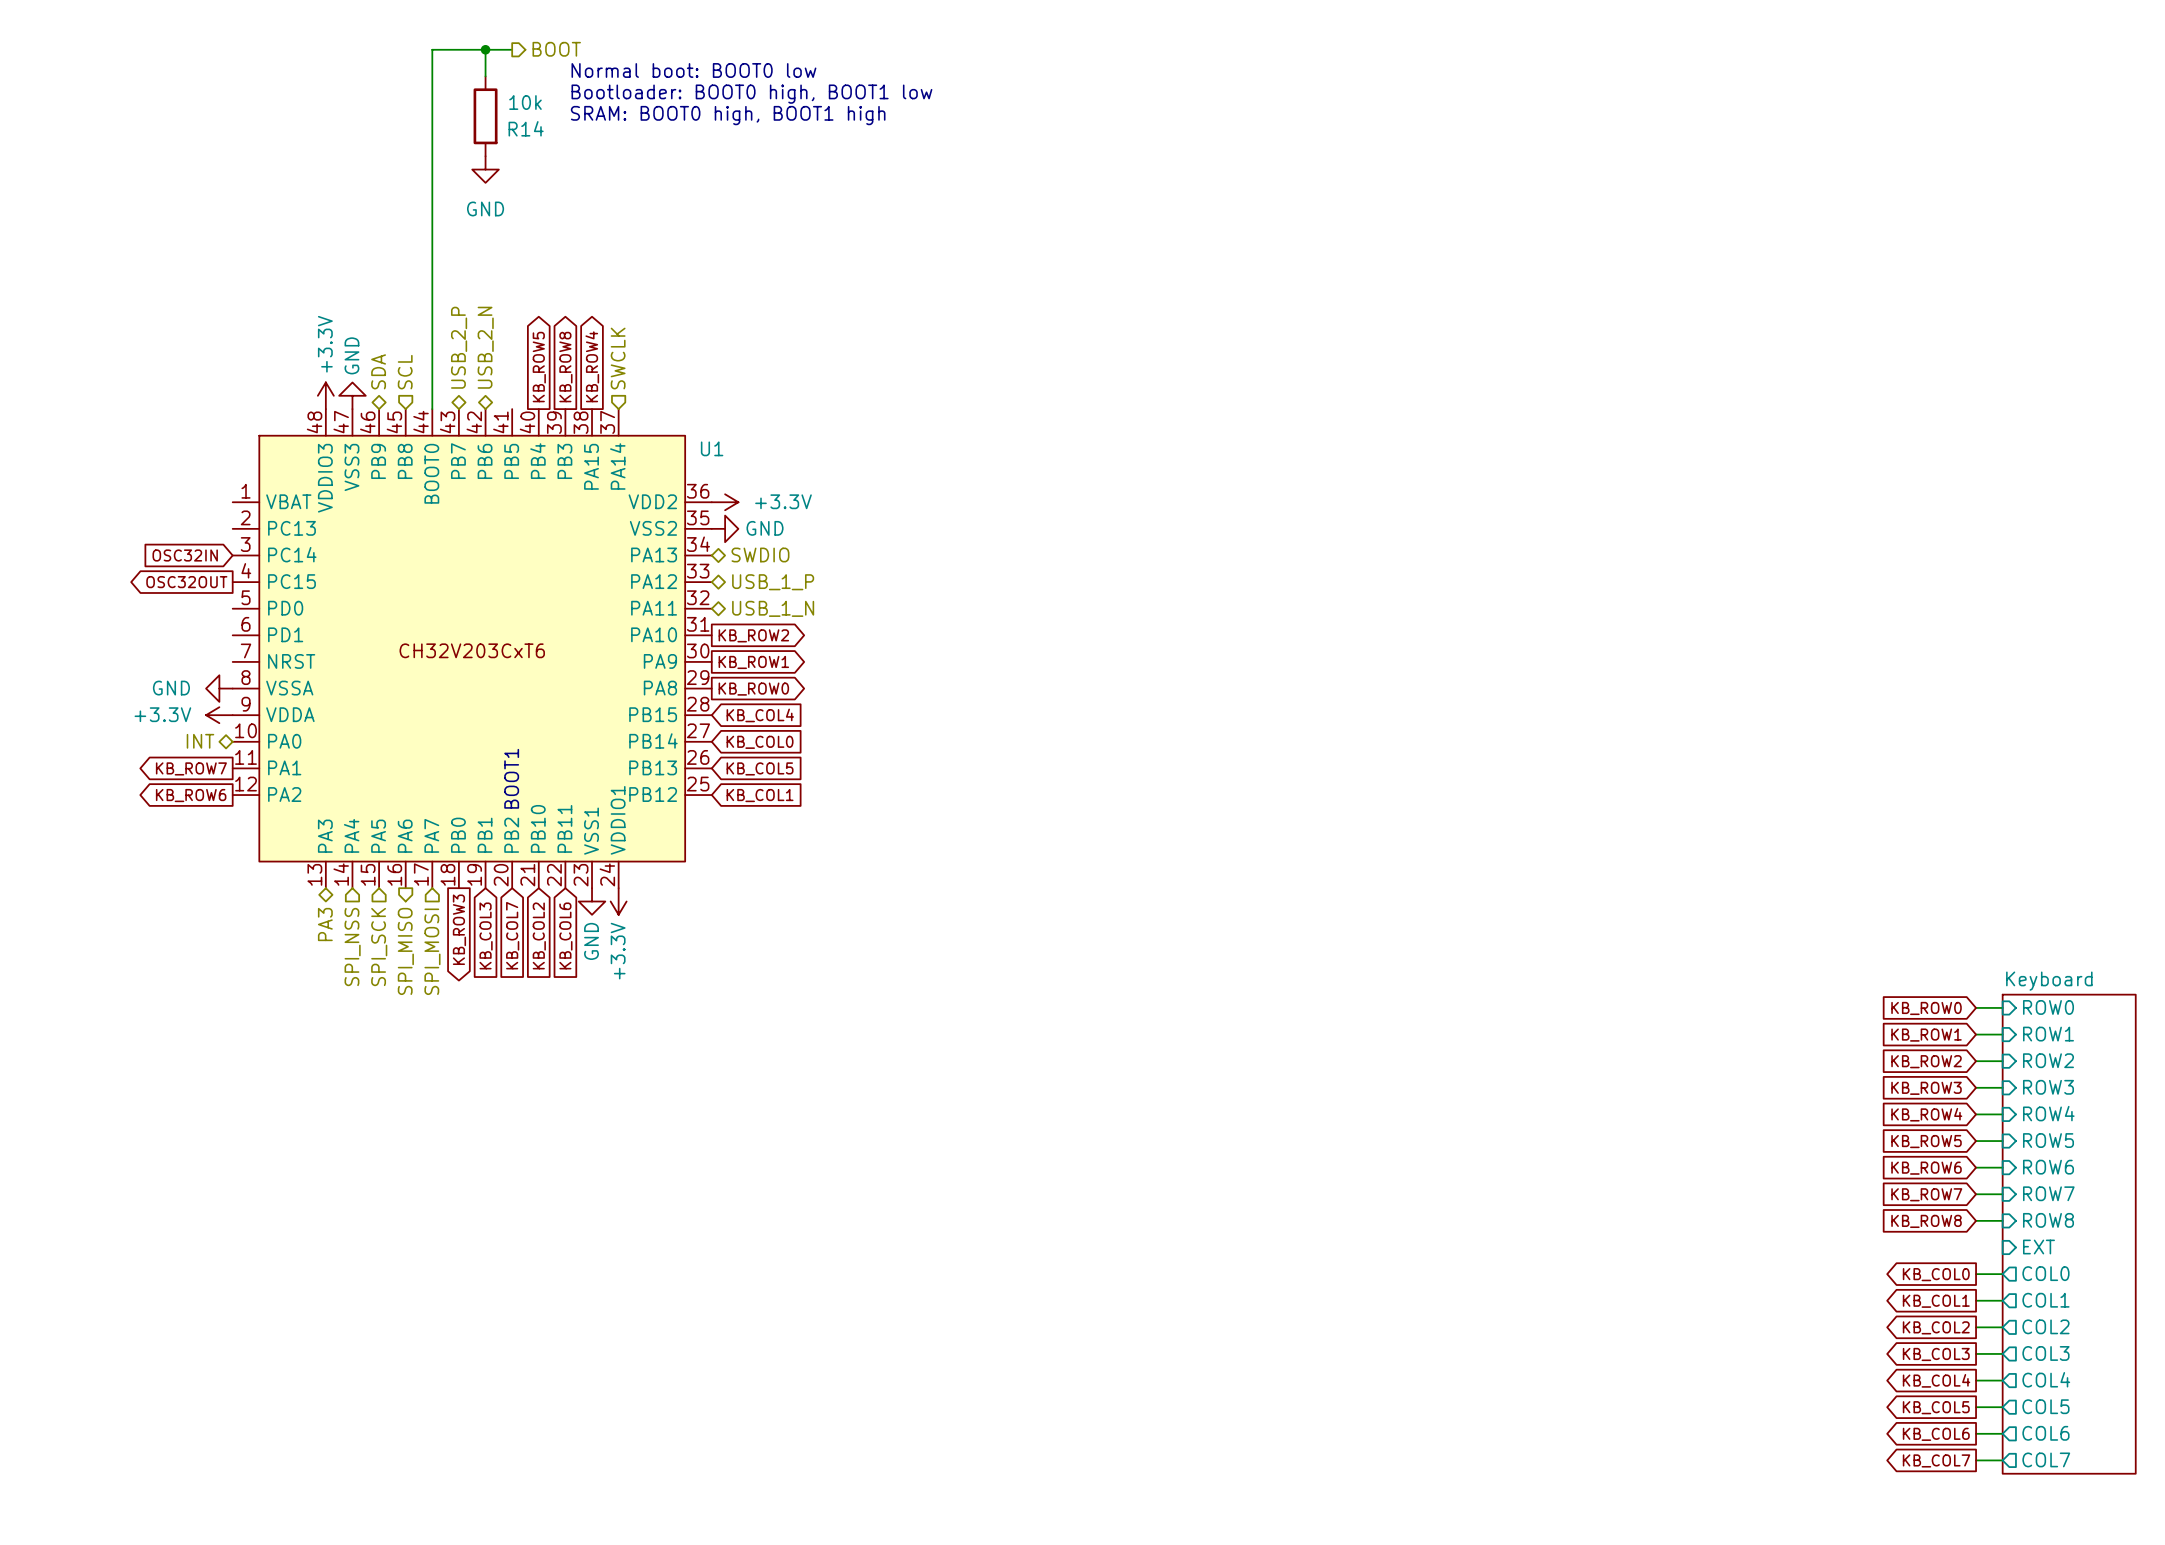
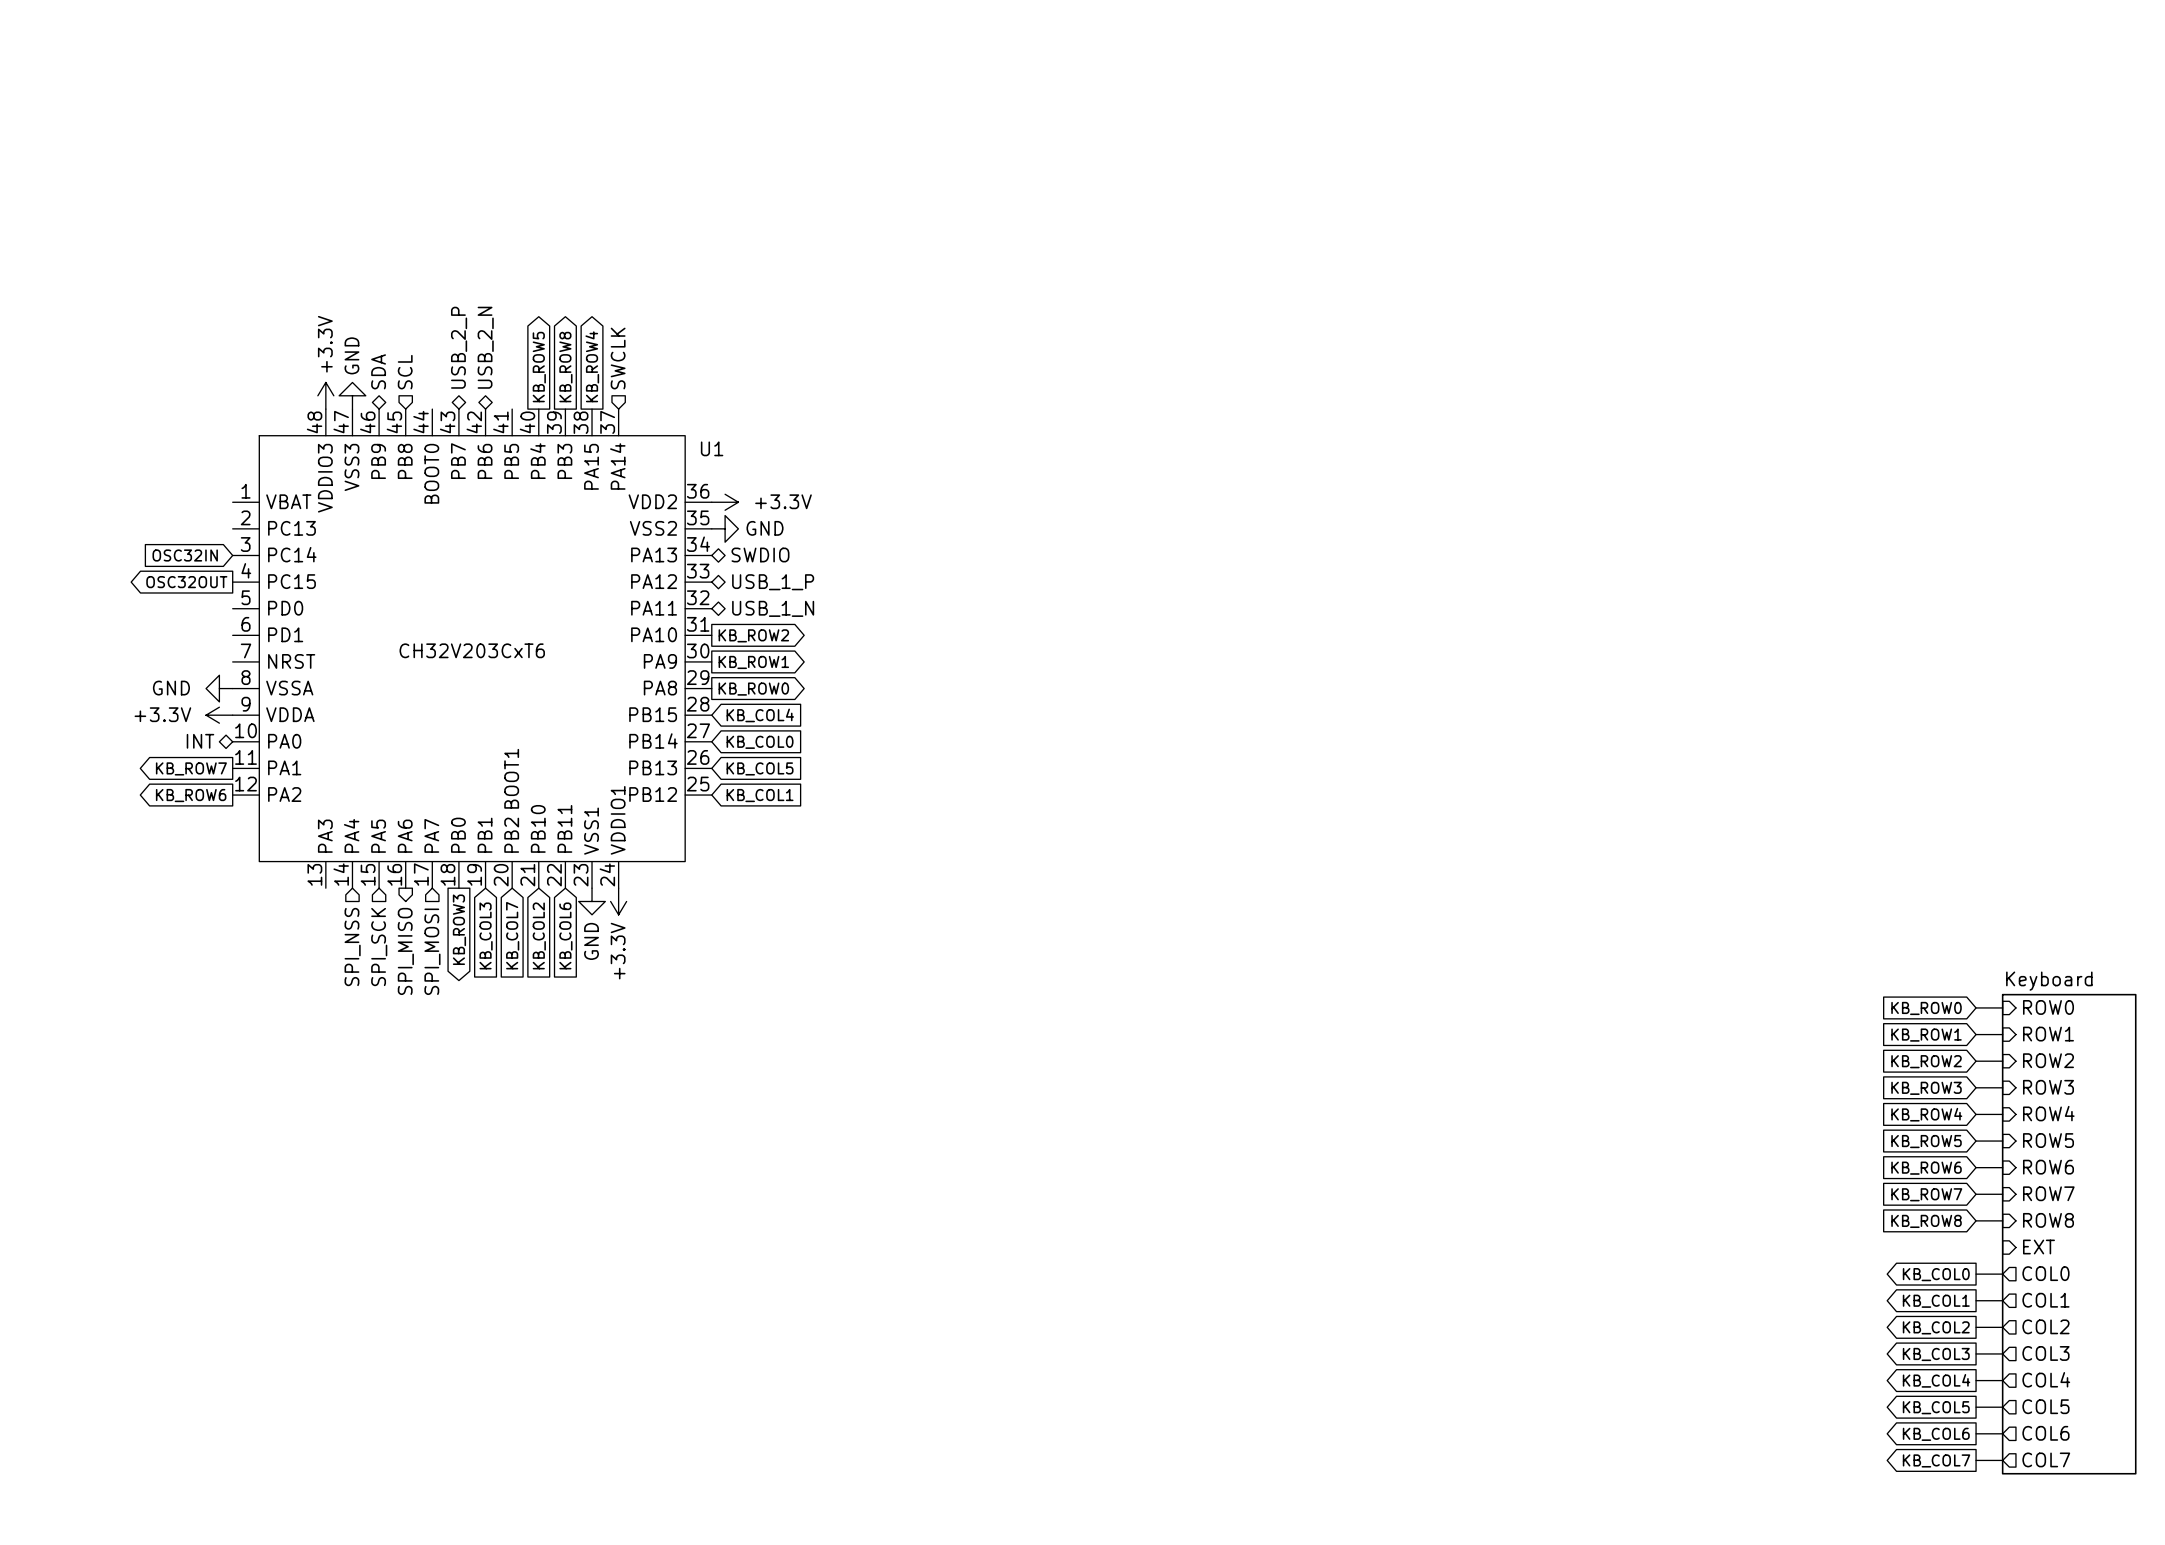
wire: (485, 49) (485, 76) -> none
junction: (485, 49) -> none
wire: (512, 49) (432, 49) (432, 409) -> none
hierarchical label: BOOT (556, 49) -> none
text: Normal boot: BOOT0 low (693, 70) -> none
text: Bootloader: BOOT0 high, BOOT1 low (751, 94) -> none
text: SRAM: BOOT0 high, BOOT1 high (728, 115) -> none
R14: 10k (485, 116) -> none
power symbol: GND (485, 169) -> none
hierarchical label: PA3 (325, 924) -> none

